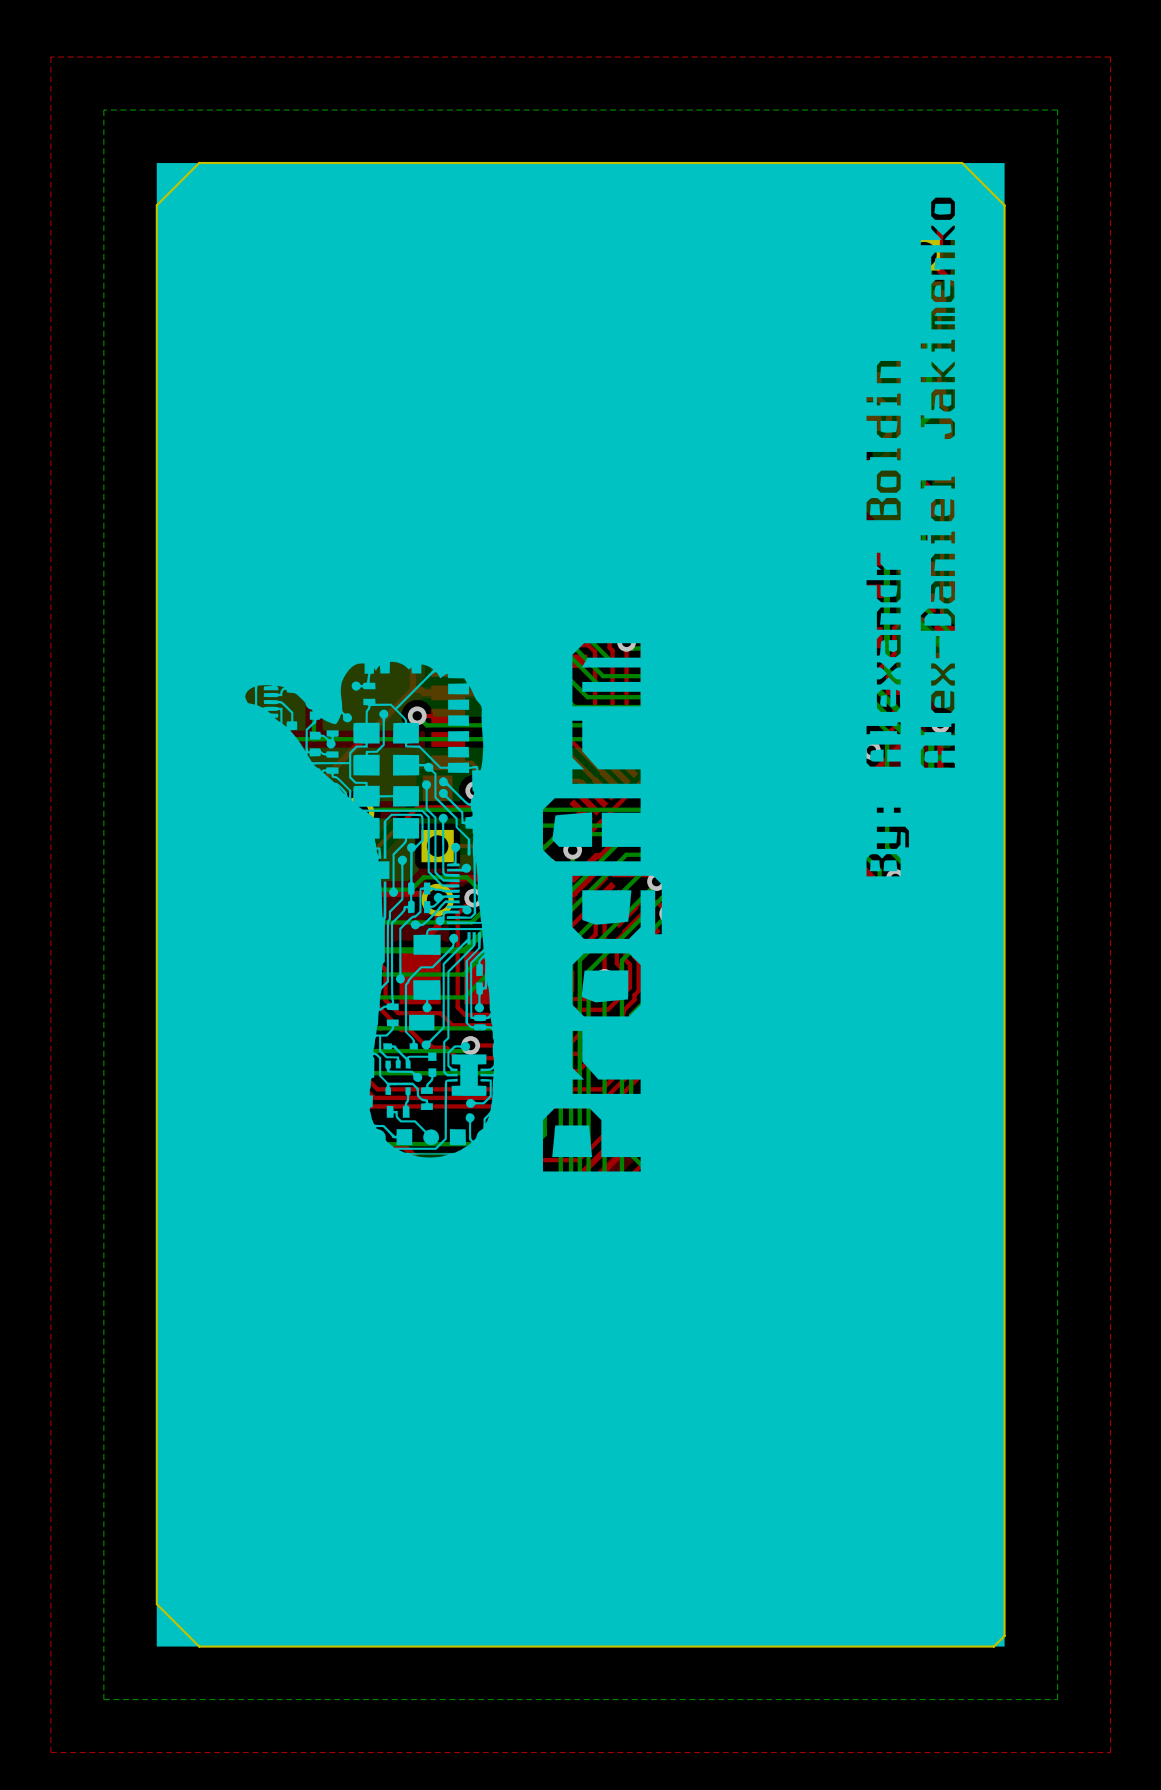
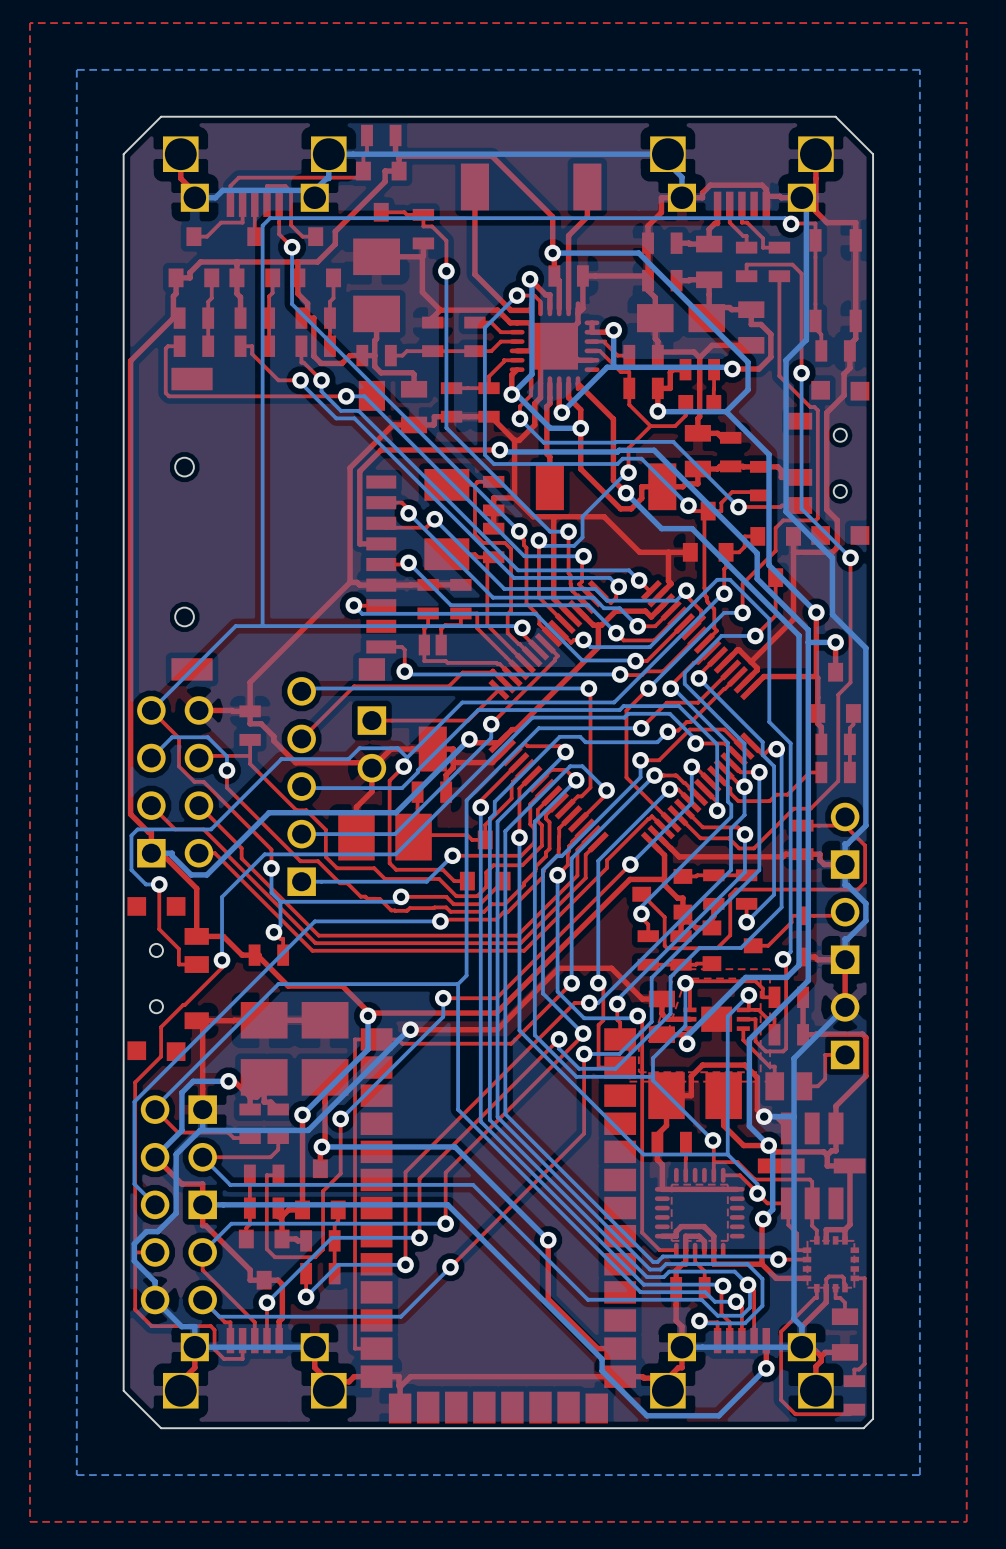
drawing: [156, 163, 1005, 1647] -> none

